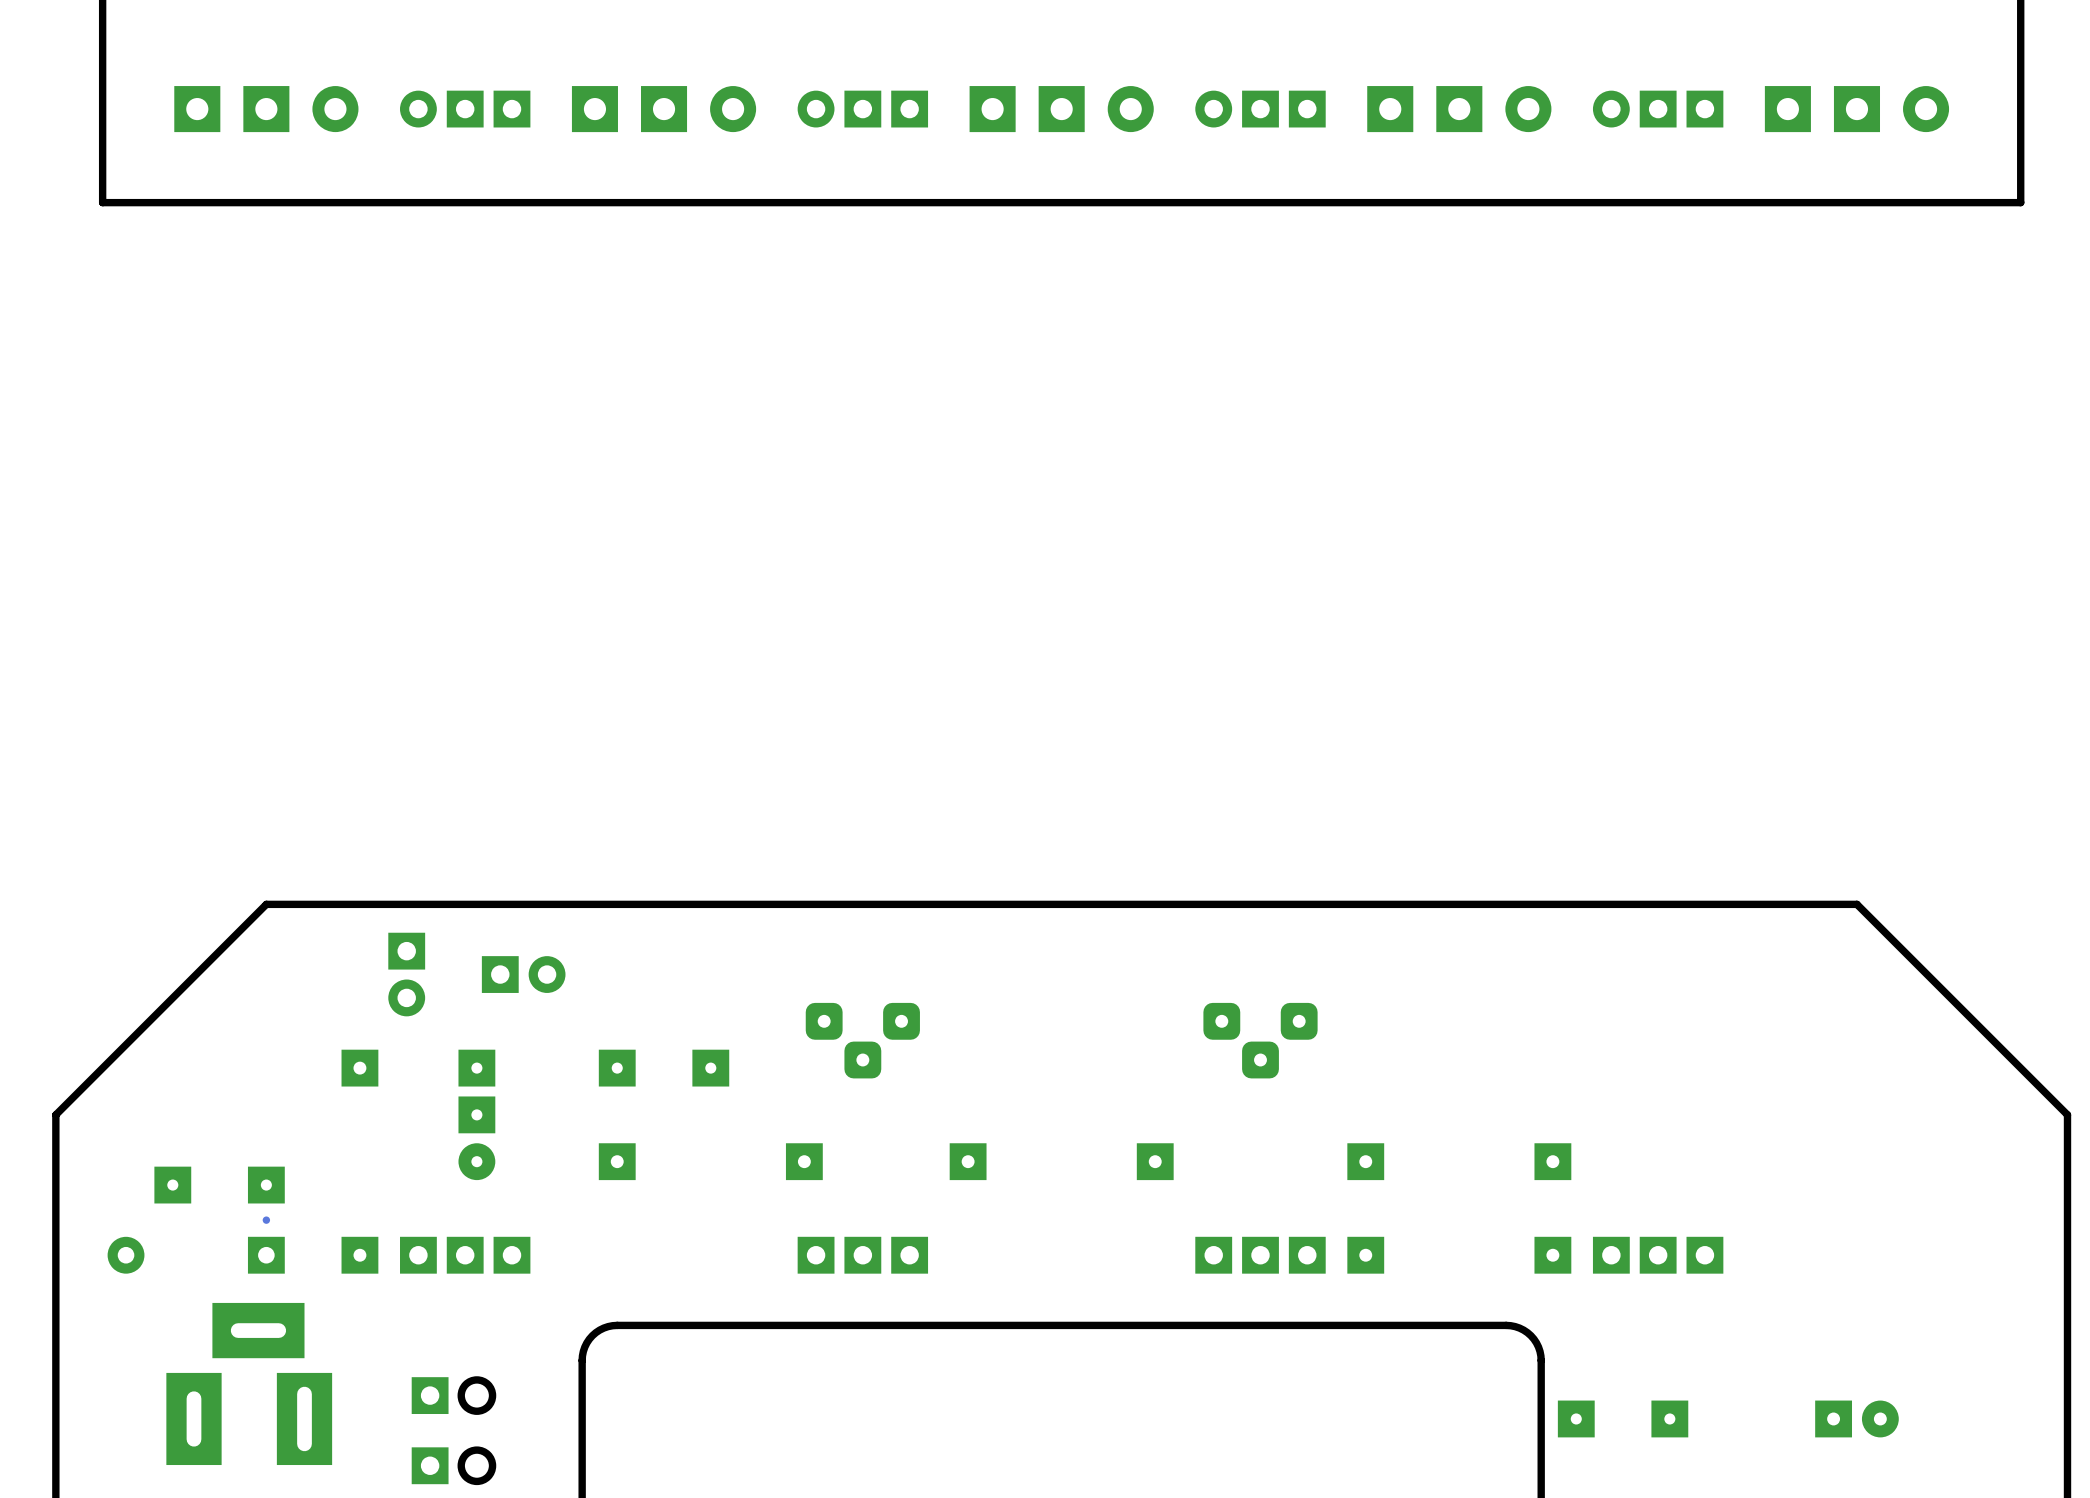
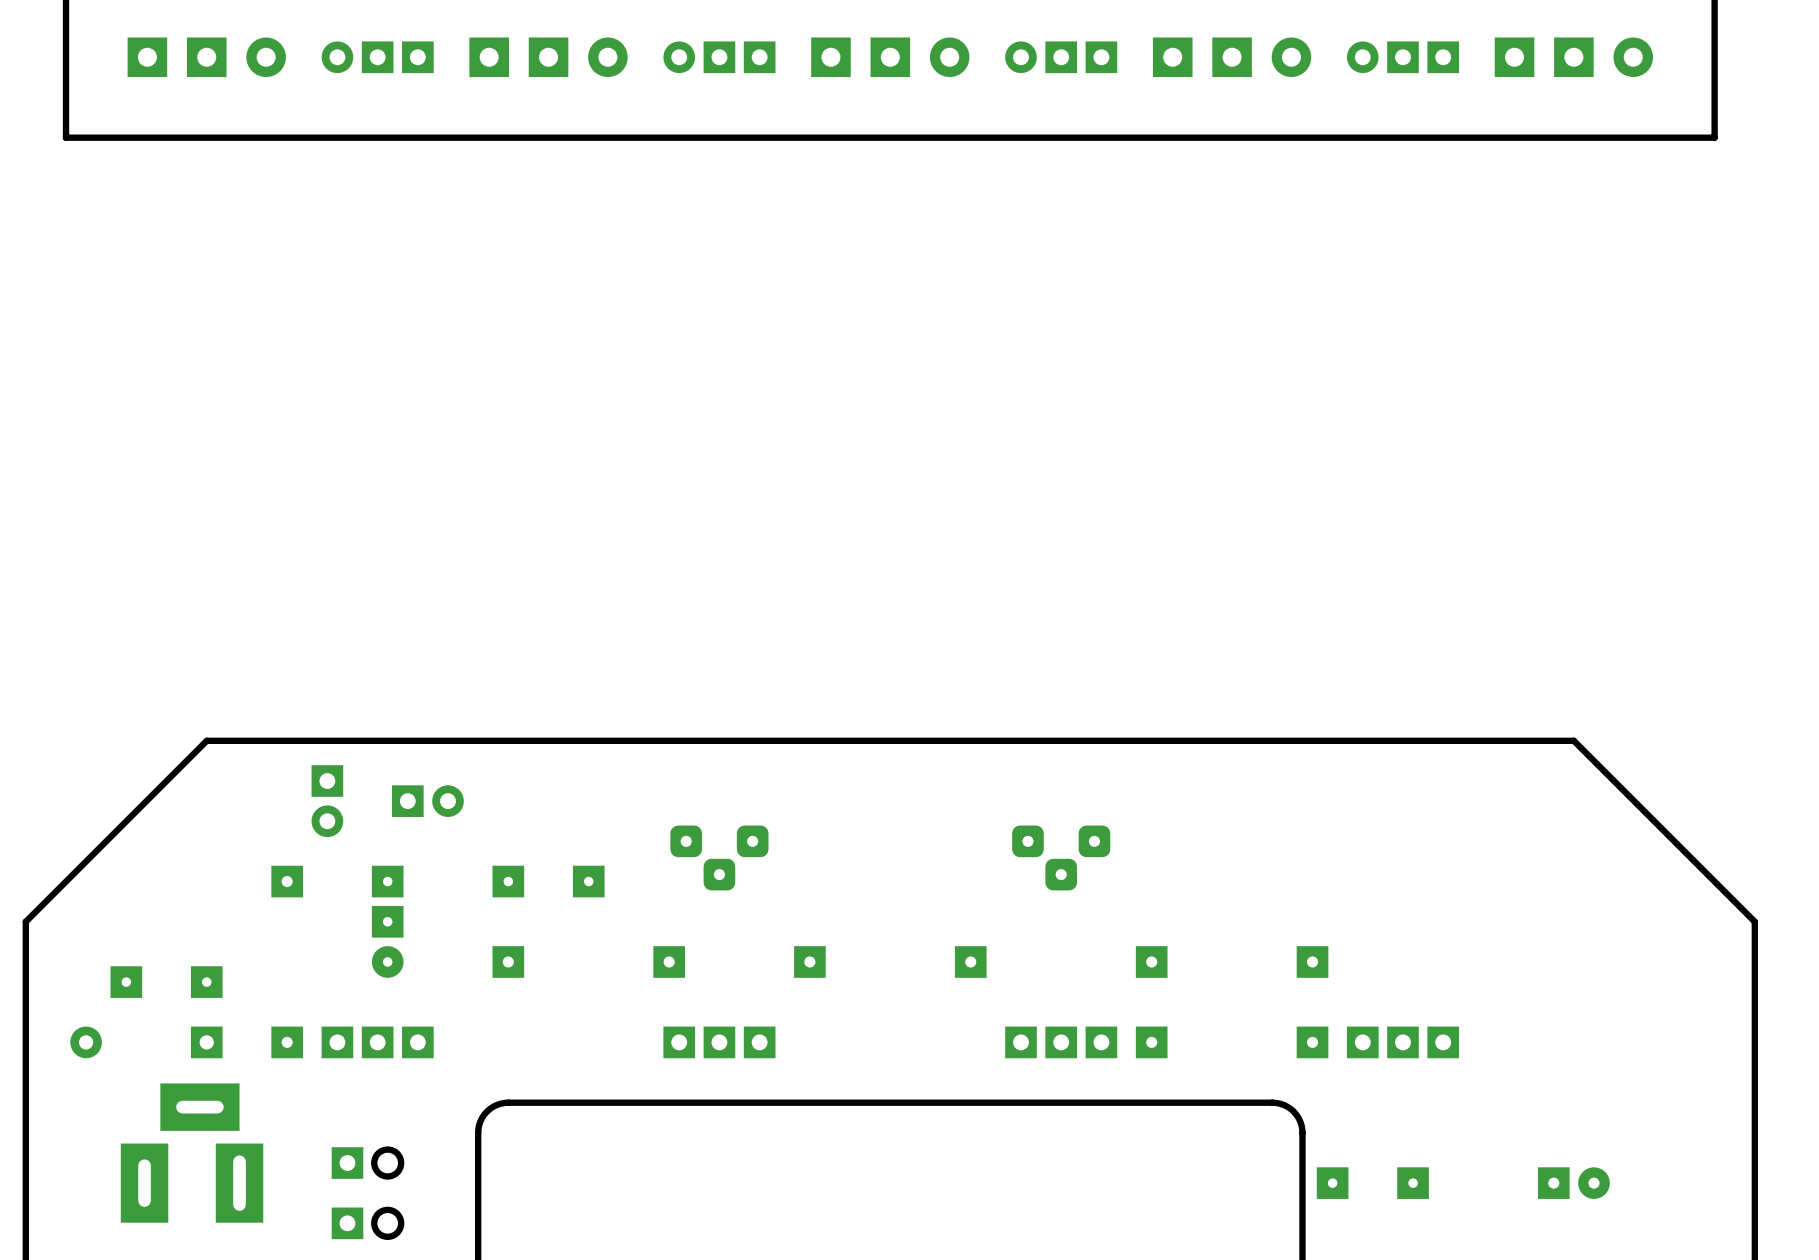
part: (266, 1220) -> none

